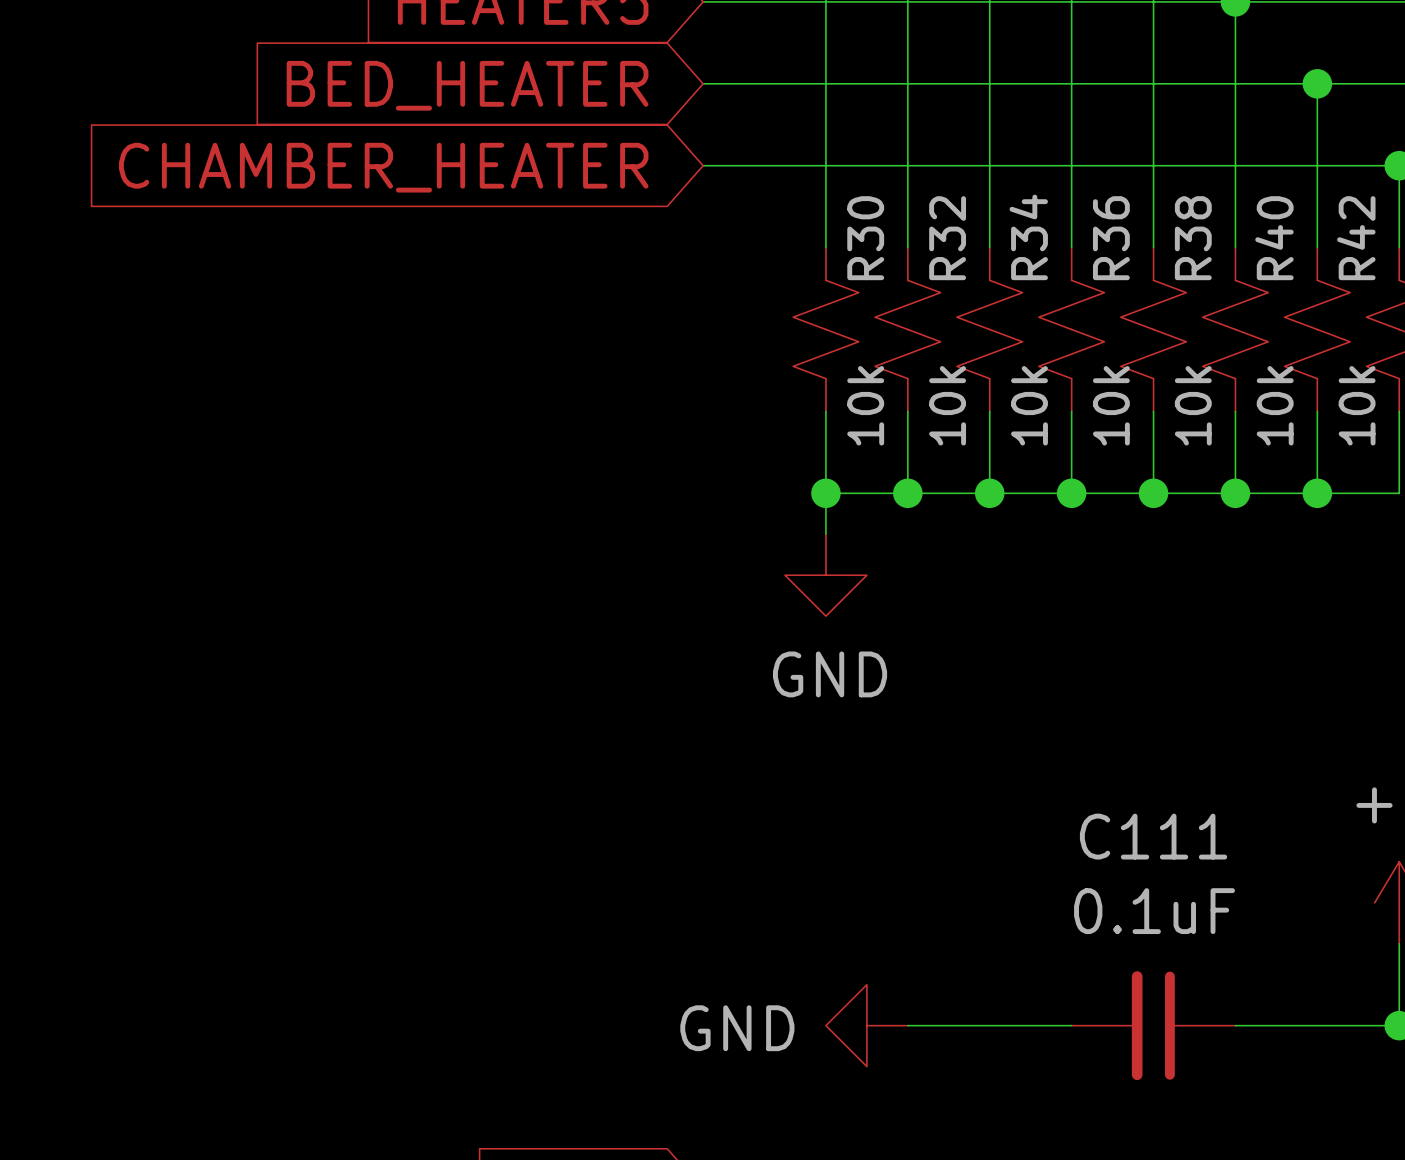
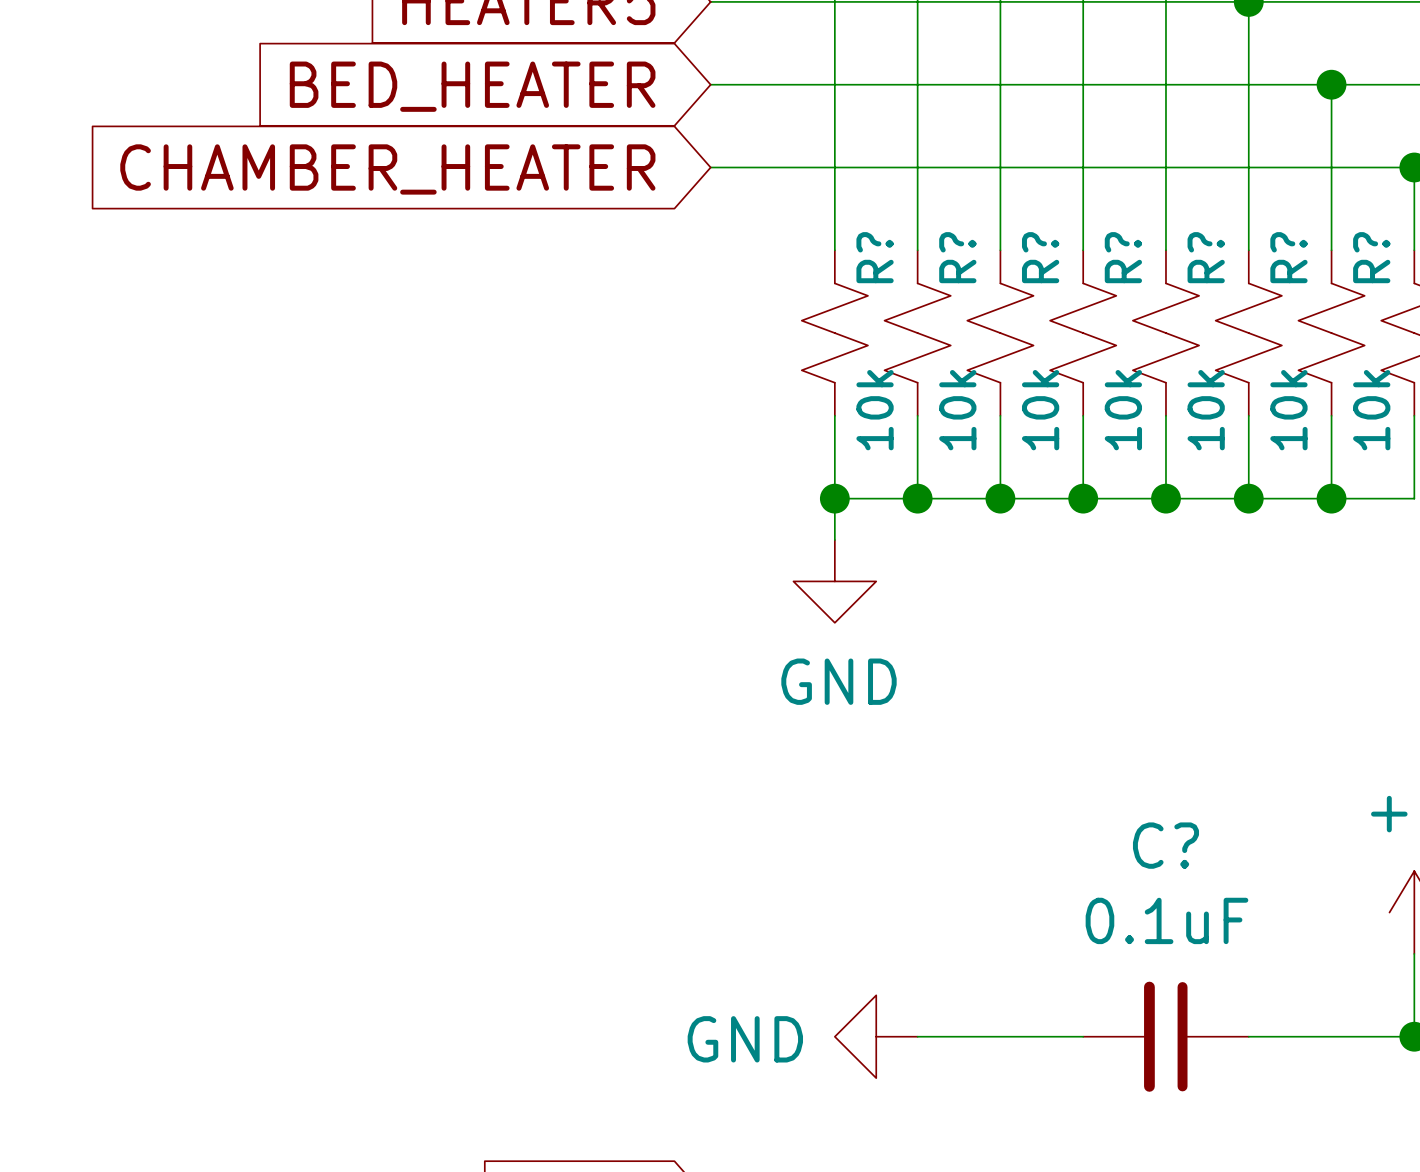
R34 name: R34 (1028, 237) -> R? (1040, 257)
R30 name: R30 (865, 238) -> R? (875, 257)
R32 name: R32 (947, 238) -> R? (957, 257)
R36 name: R36 (1111, 238) -> R? (1123, 257)
R38 name: R38 (1193, 238) -> R? (1206, 257)
R40 name: R40 (1274, 238) -> R? (1288, 257)
R42 name: R42 (1356, 238) -> R? (1371, 257)
C111 name: C111 (1153, 836) -> C? (1165, 845)

